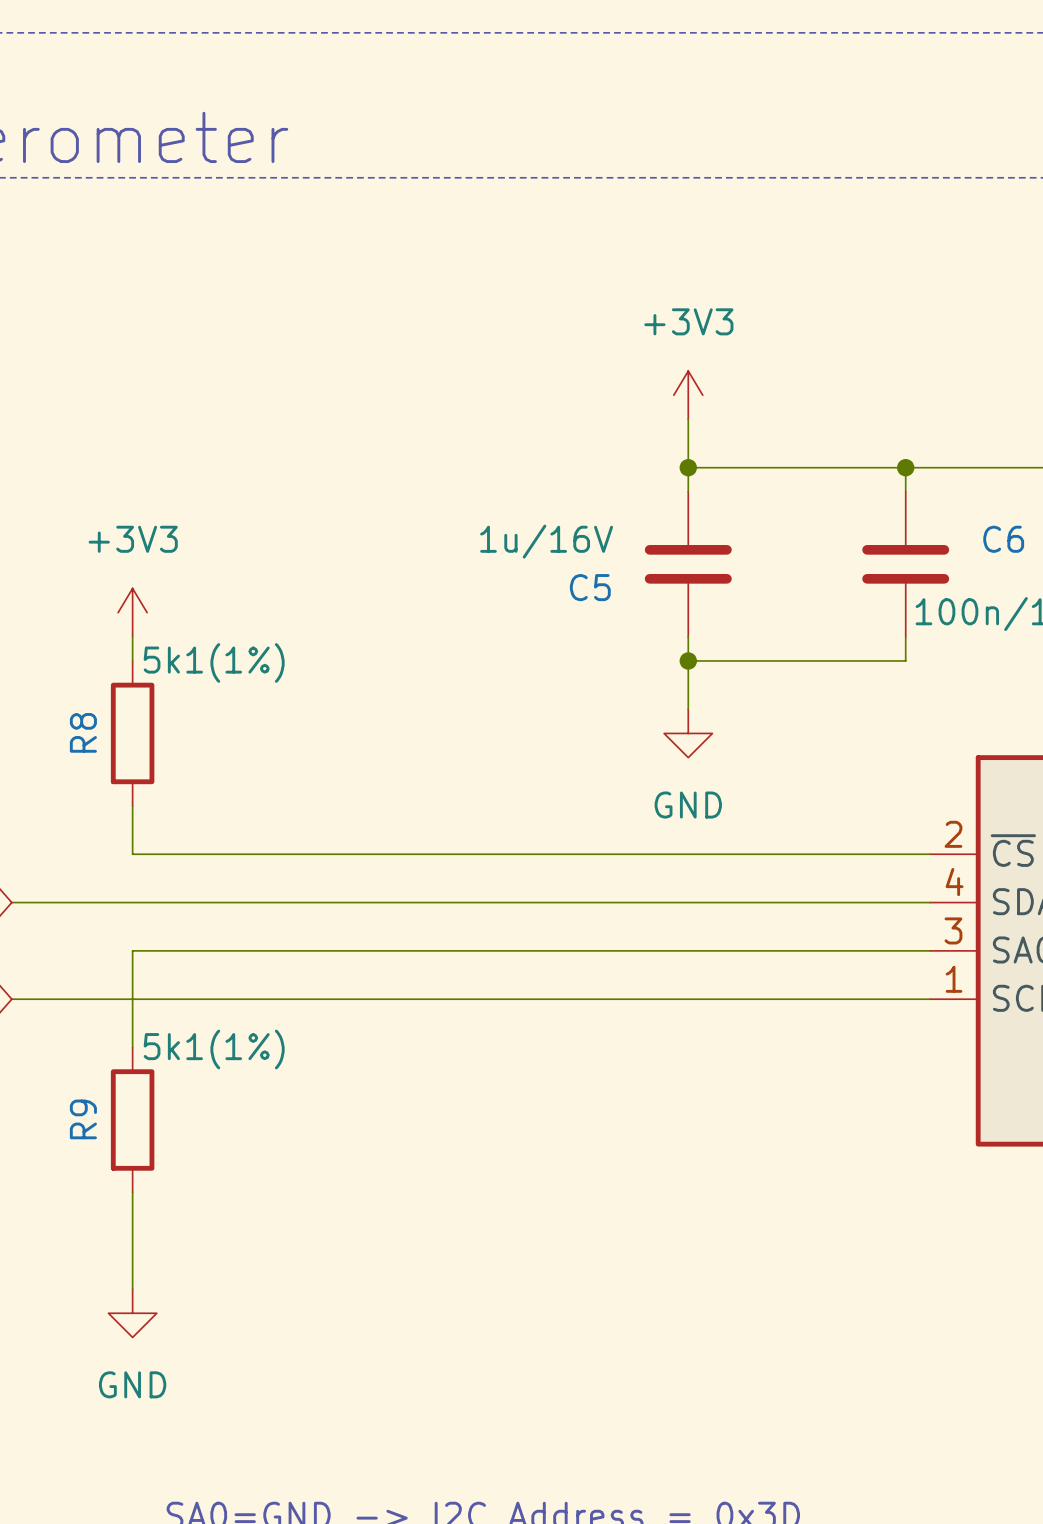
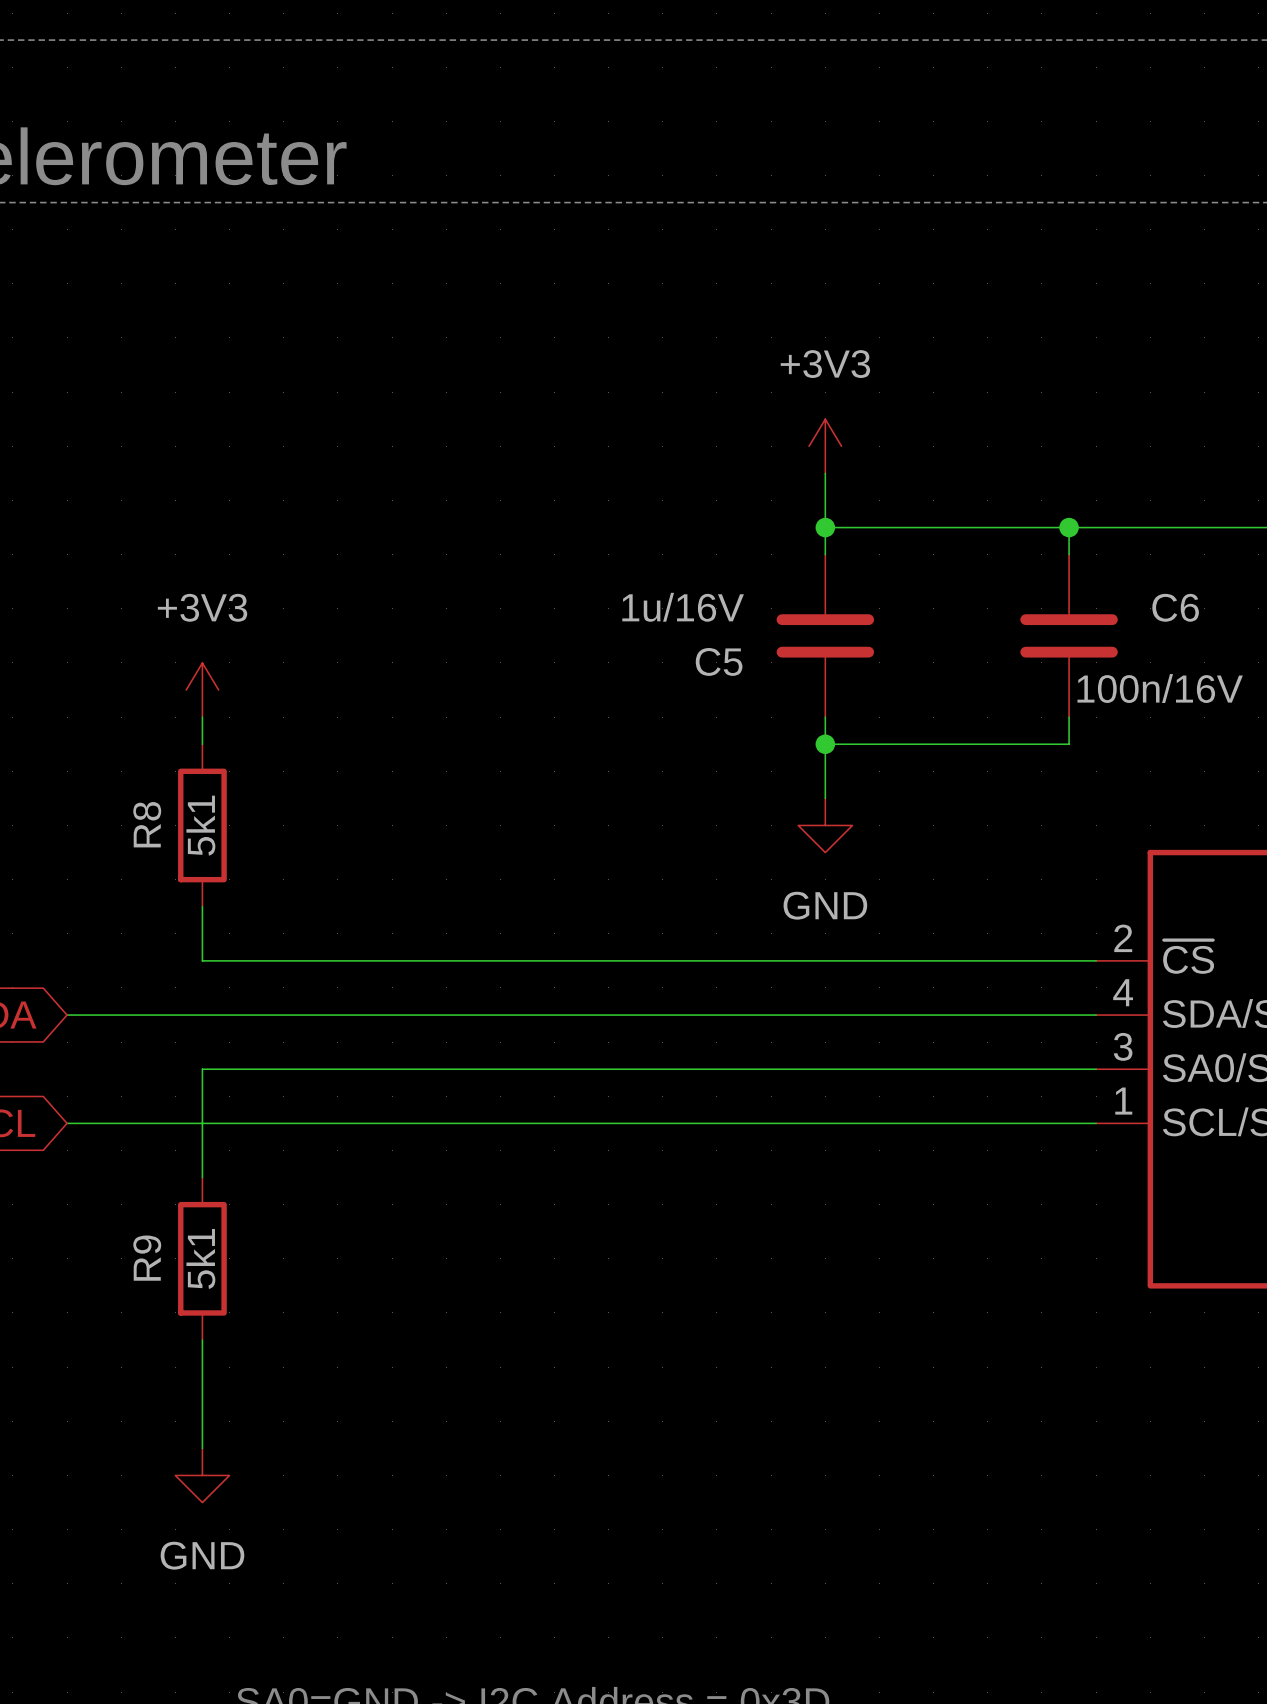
R8 value: 5k1(1%) (214, 662) -> 5k1 (200, 825)
R9 value: 5k1(1%) (214, 1049) -> 5k1 (200, 1258)

